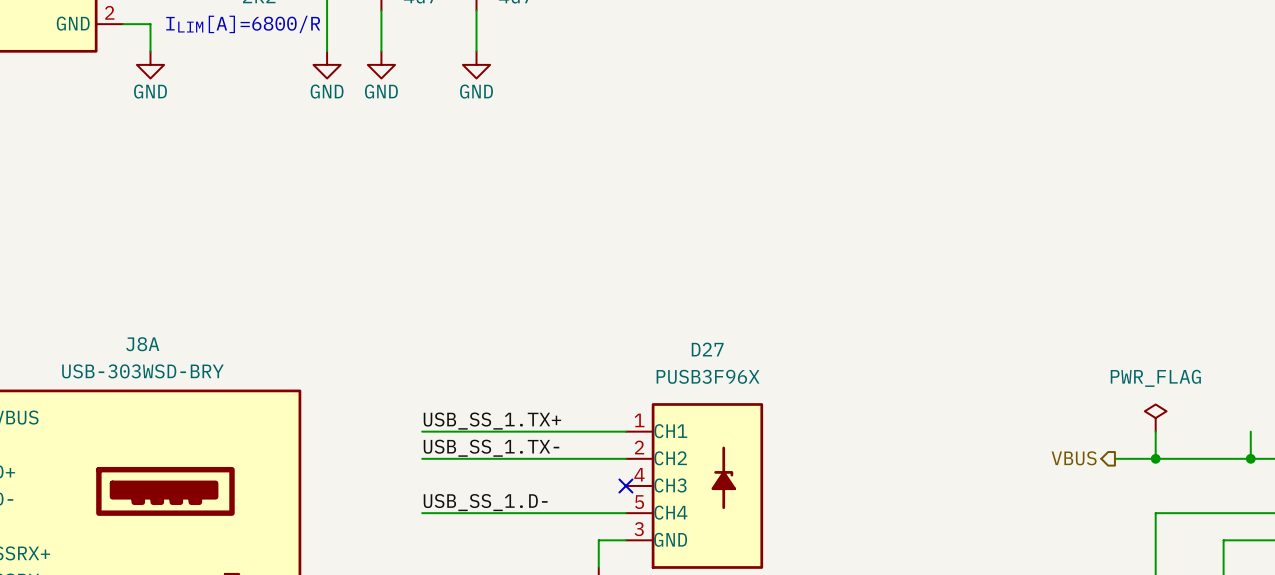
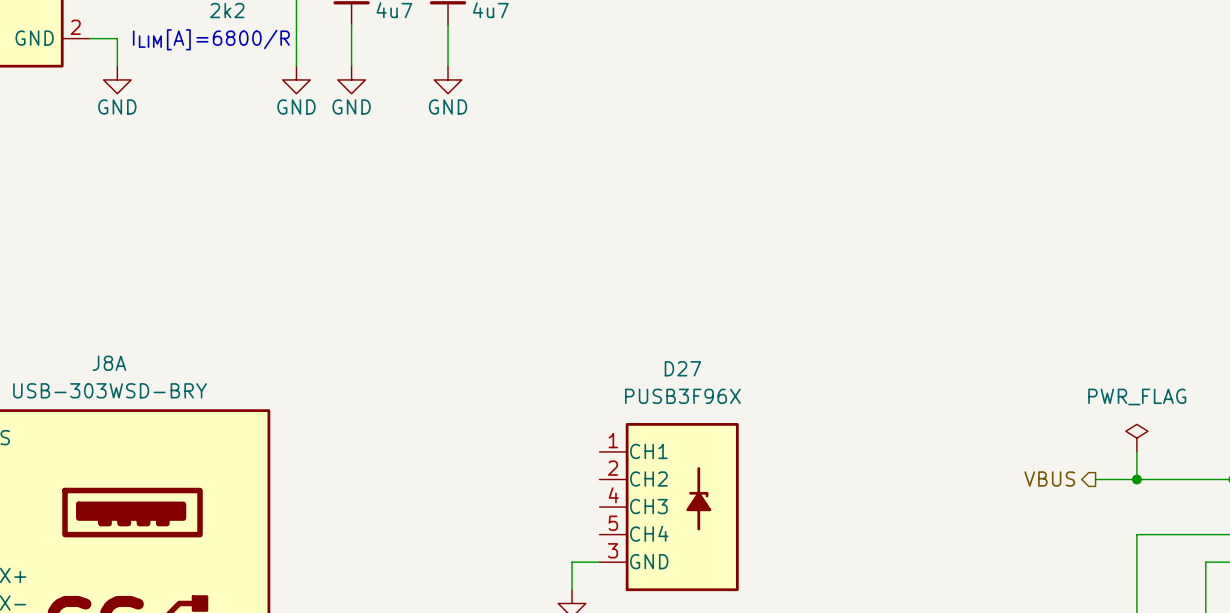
label: USB_SS_1.TX+ (492, 421) -> none
wire: (422, 431) (625, 431) -> none
label: USB_SS_1.TX- (491, 448) -> none
wire: (422, 458) (625, 458) -> none
no-connect mark: (625, 485) -> none
label: USB_SS_1.D- (485, 502) -> none
wire: (422, 513) (625, 513) -> none

